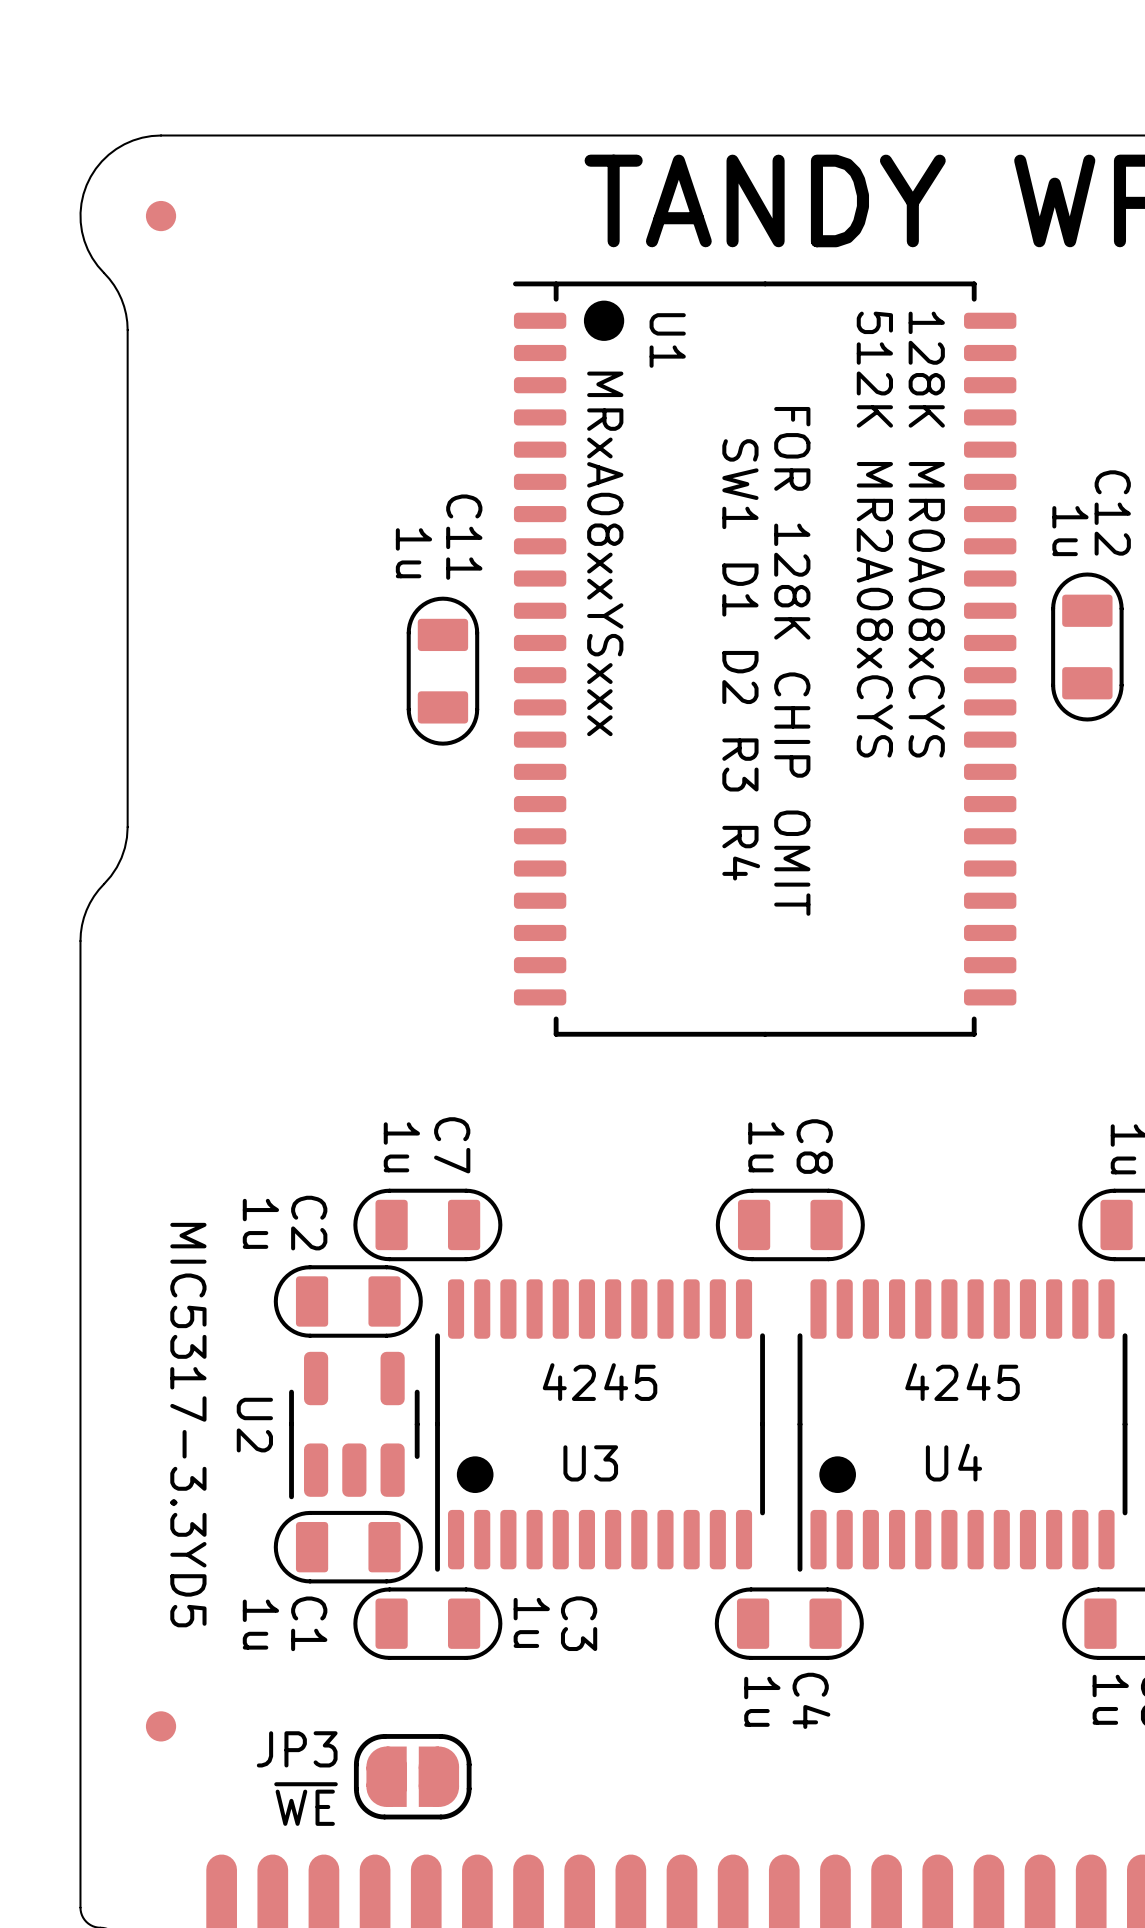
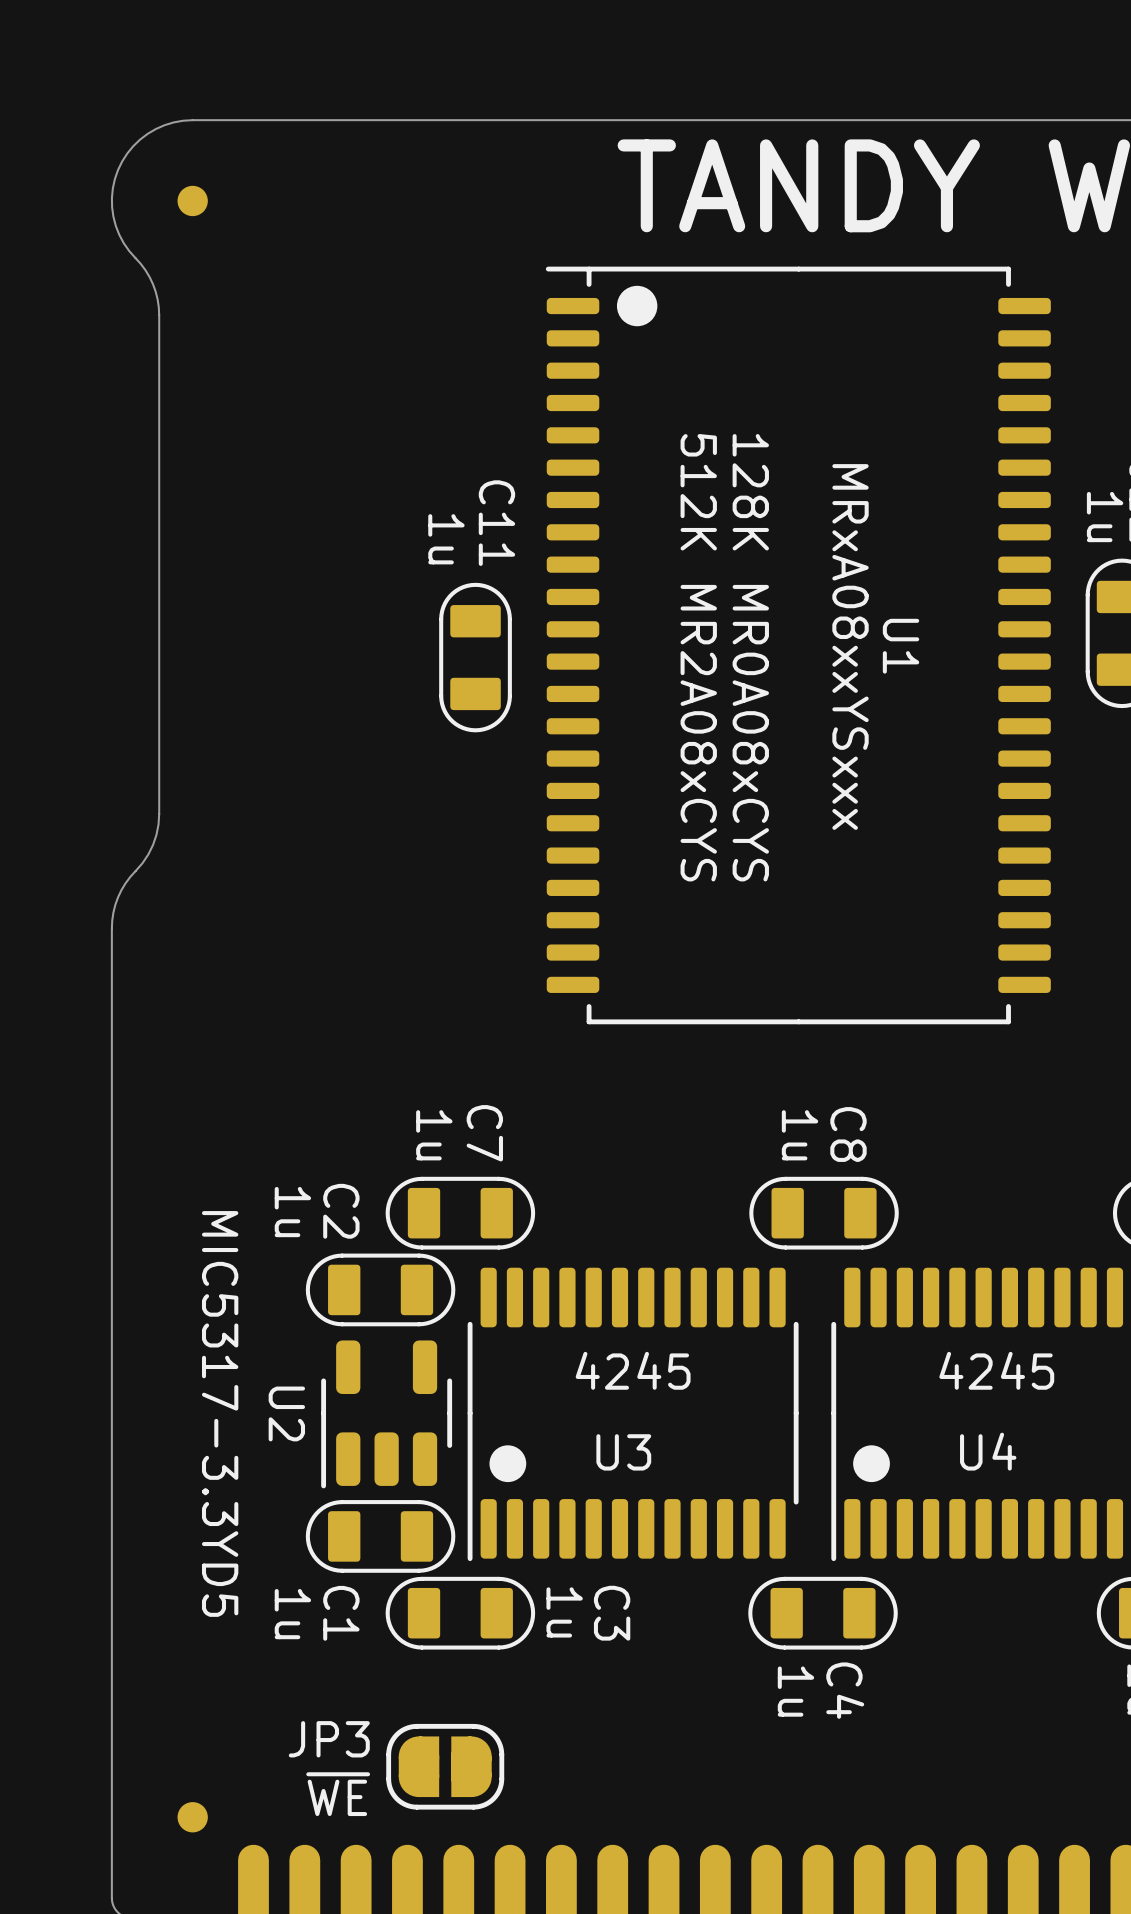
U1 name position: U1 (667, 340) -> U1 (901, 646)
text position: 512K MR2A08xCYS (874, 534) -> 512K MR2A08xCYS (698, 657)
text position: 128K MR0A08xCYS (926, 534) -> 128K MR0A08xCYS (750, 657)
U1 value position: MRxA08xxYSxxx (605, 553) -> MRxA08xxYSxxx (850, 646)
text: SW1 D1 D2 R3 R4 (741, 659) -> none
text: FOR 128K CHIP OMIT (792, 661) -> none
part position: (161, 1726) -> (192, 1817)

